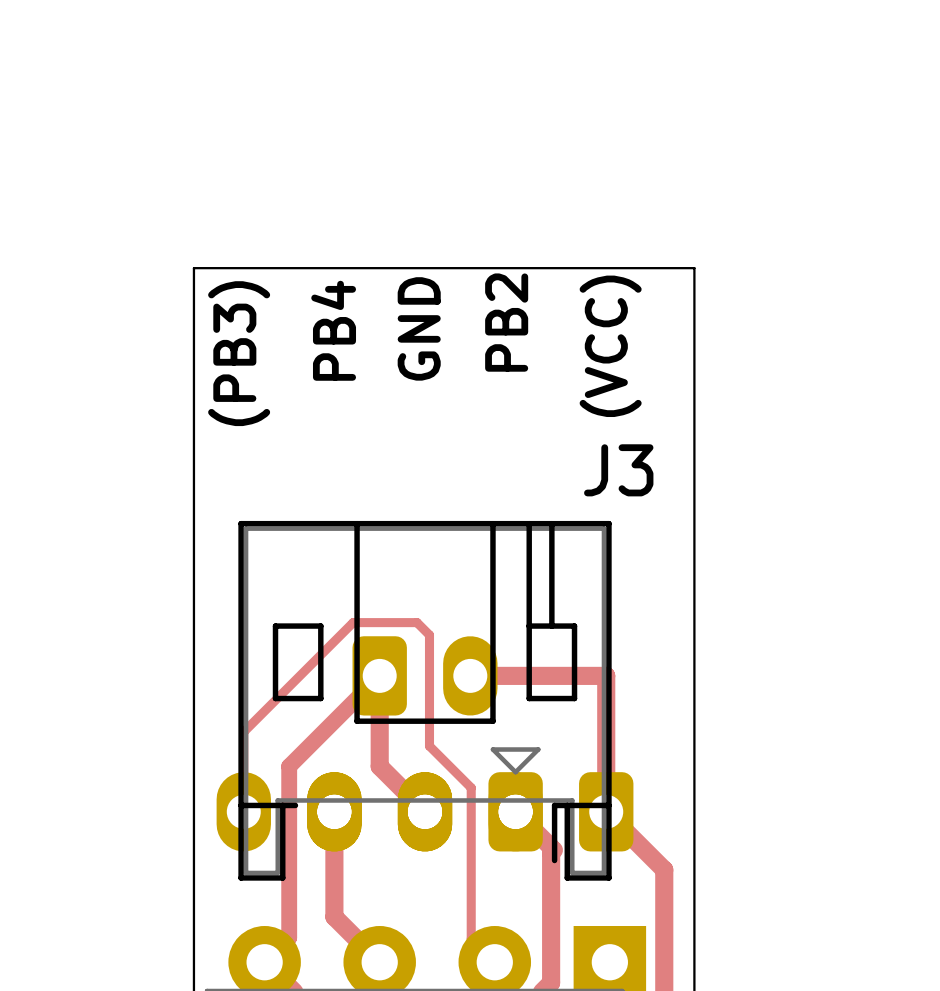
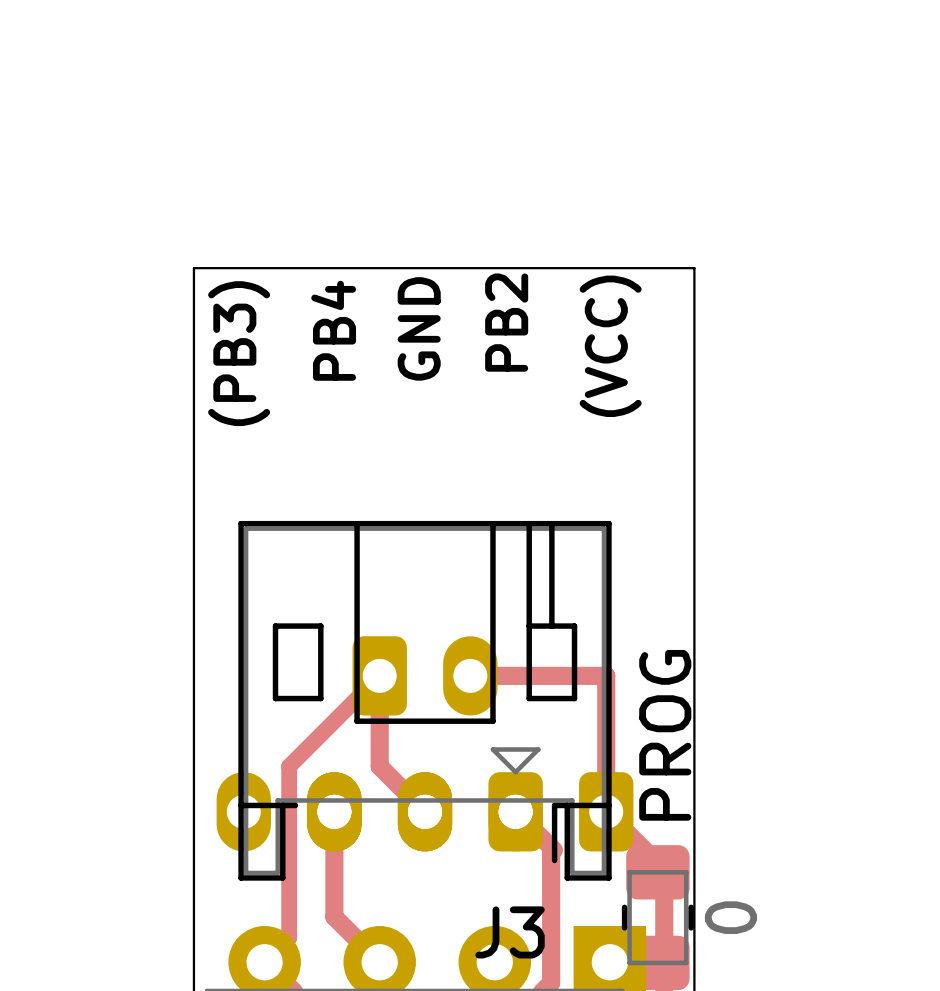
J3 name position: J3 (618, 470) -> J3 (510, 932)
top track: (243, 811) (243, 732) (353, 622) (417, 622) (429, 635) (429, 746) (471, 787) (471, 938) (494, 962) -> none
PROG: none -> 0 (657, 917)

